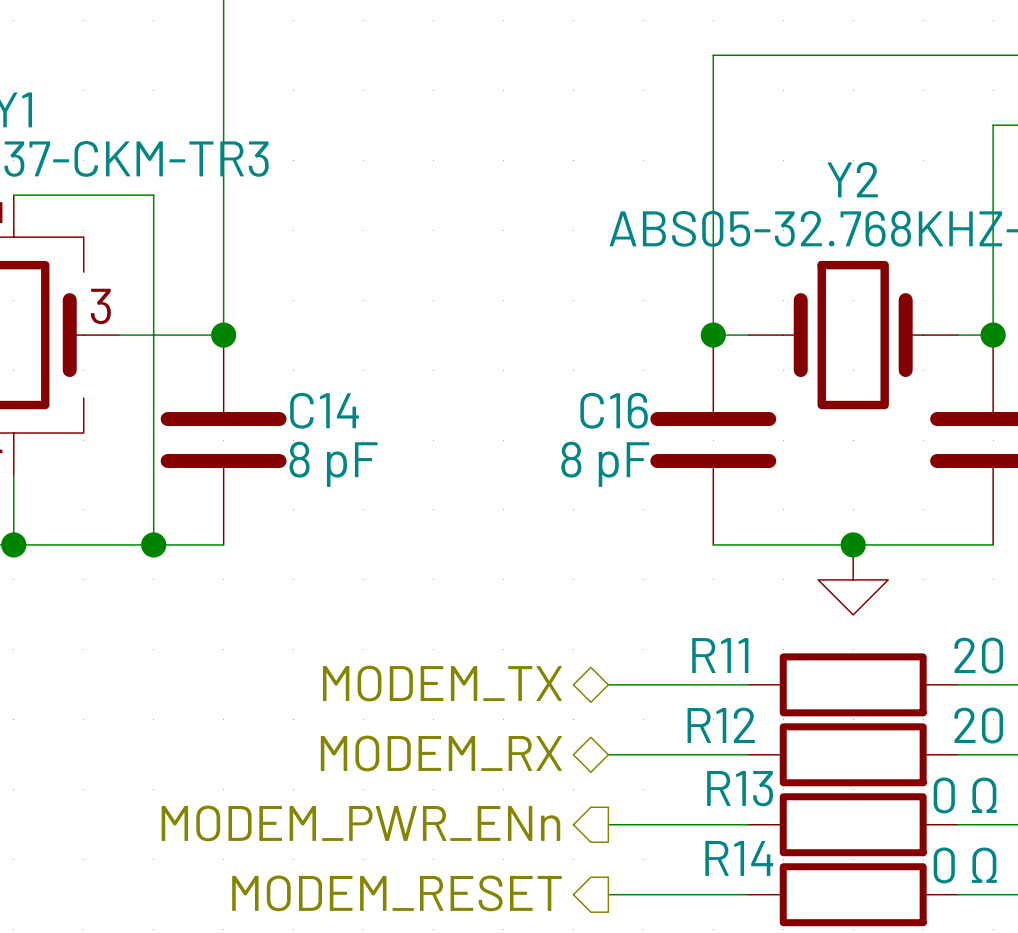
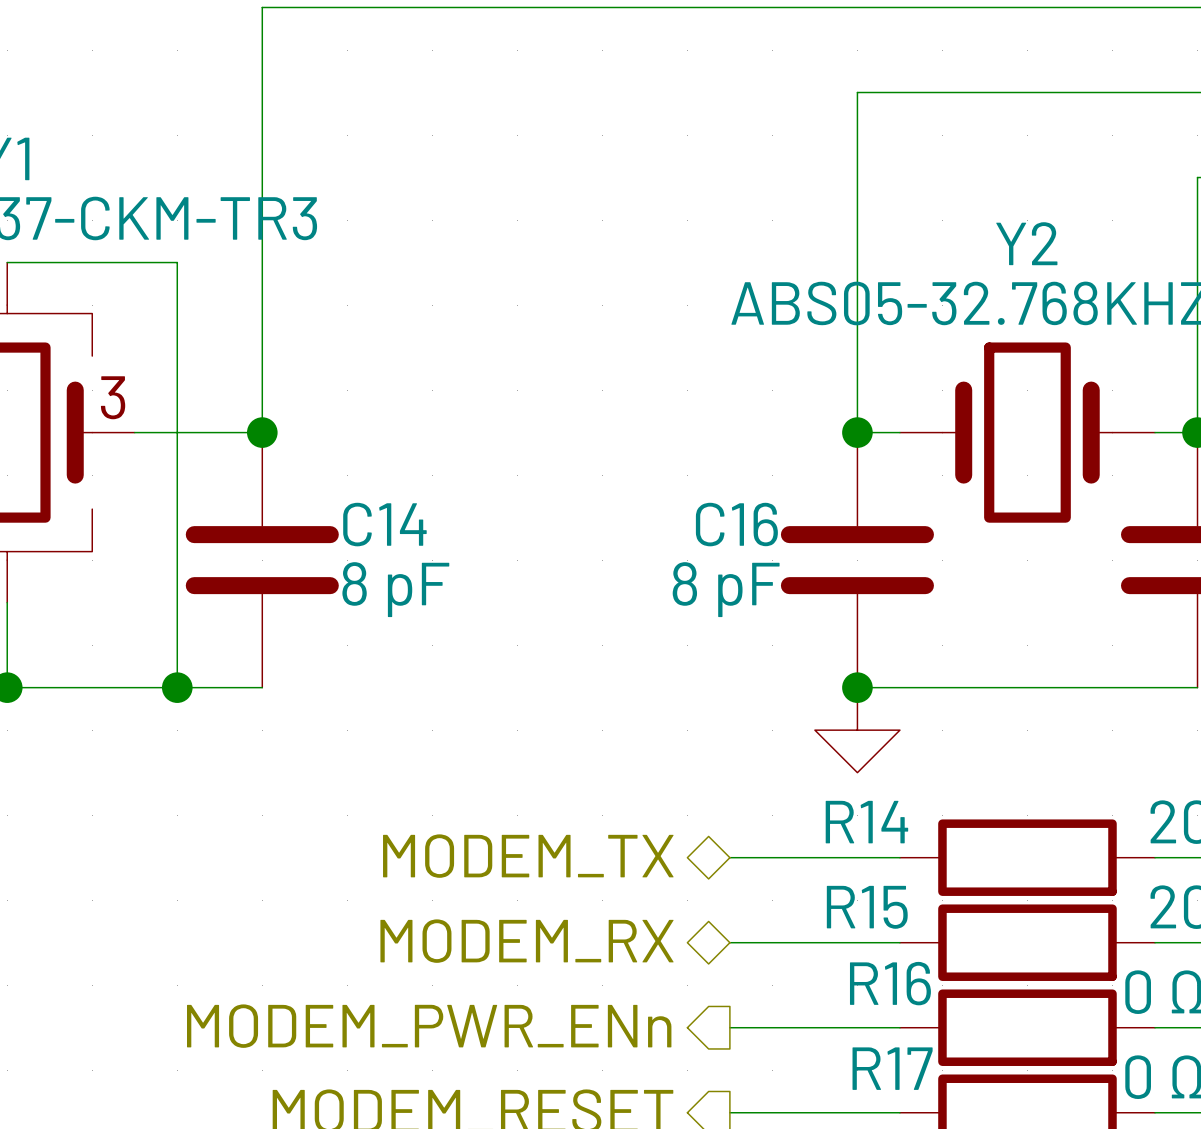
junction position: (853, 544) -> (857, 687)
power symbol position: (853, 579) -> (857, 730)
R11 name: R11 (720, 655) -> R14 (866, 822)
R12 name: R12 (721, 725) -> R15 (867, 907)
R13 name: R13 (740, 788) -> R16 (890, 983)
R14 name: R14 (739, 858) -> R17 (892, 1068)

